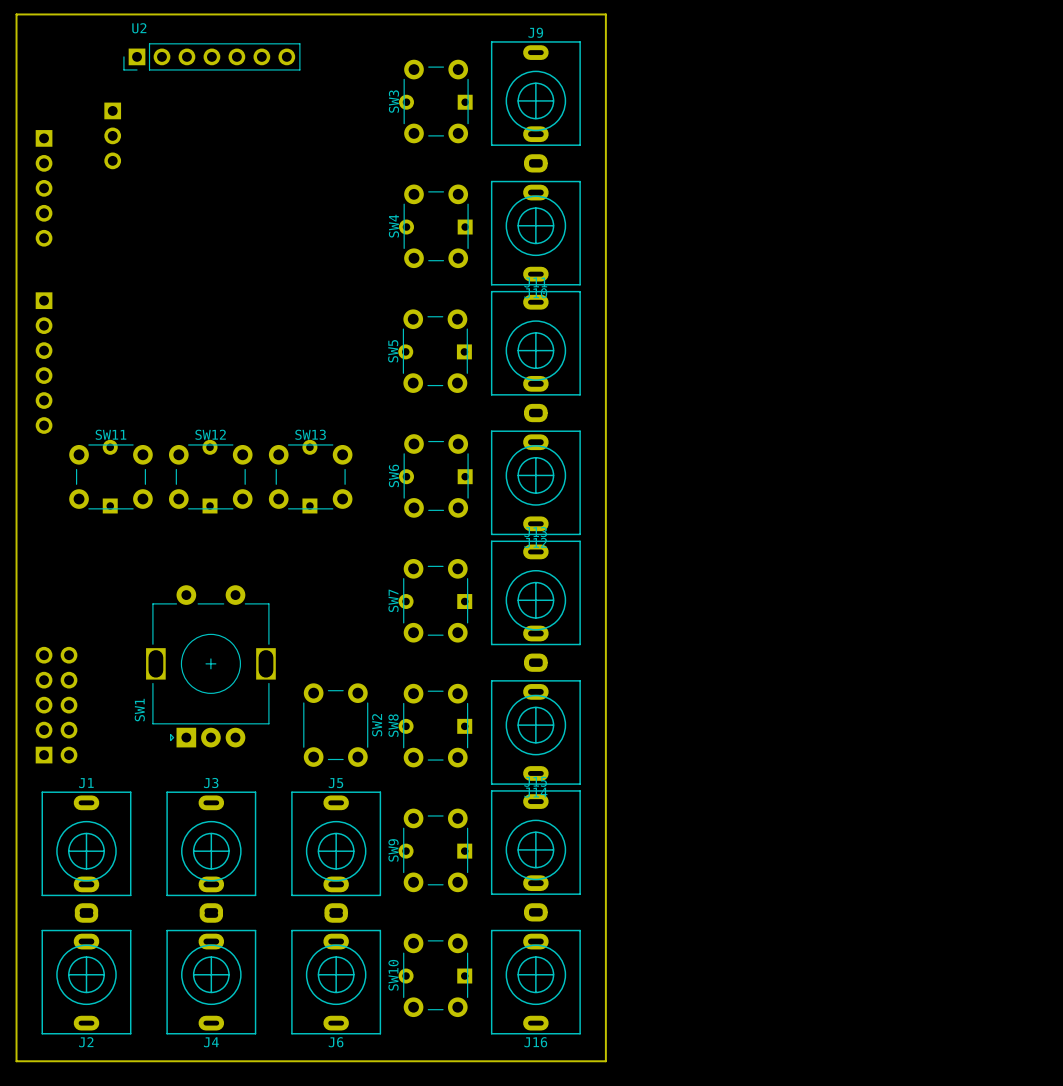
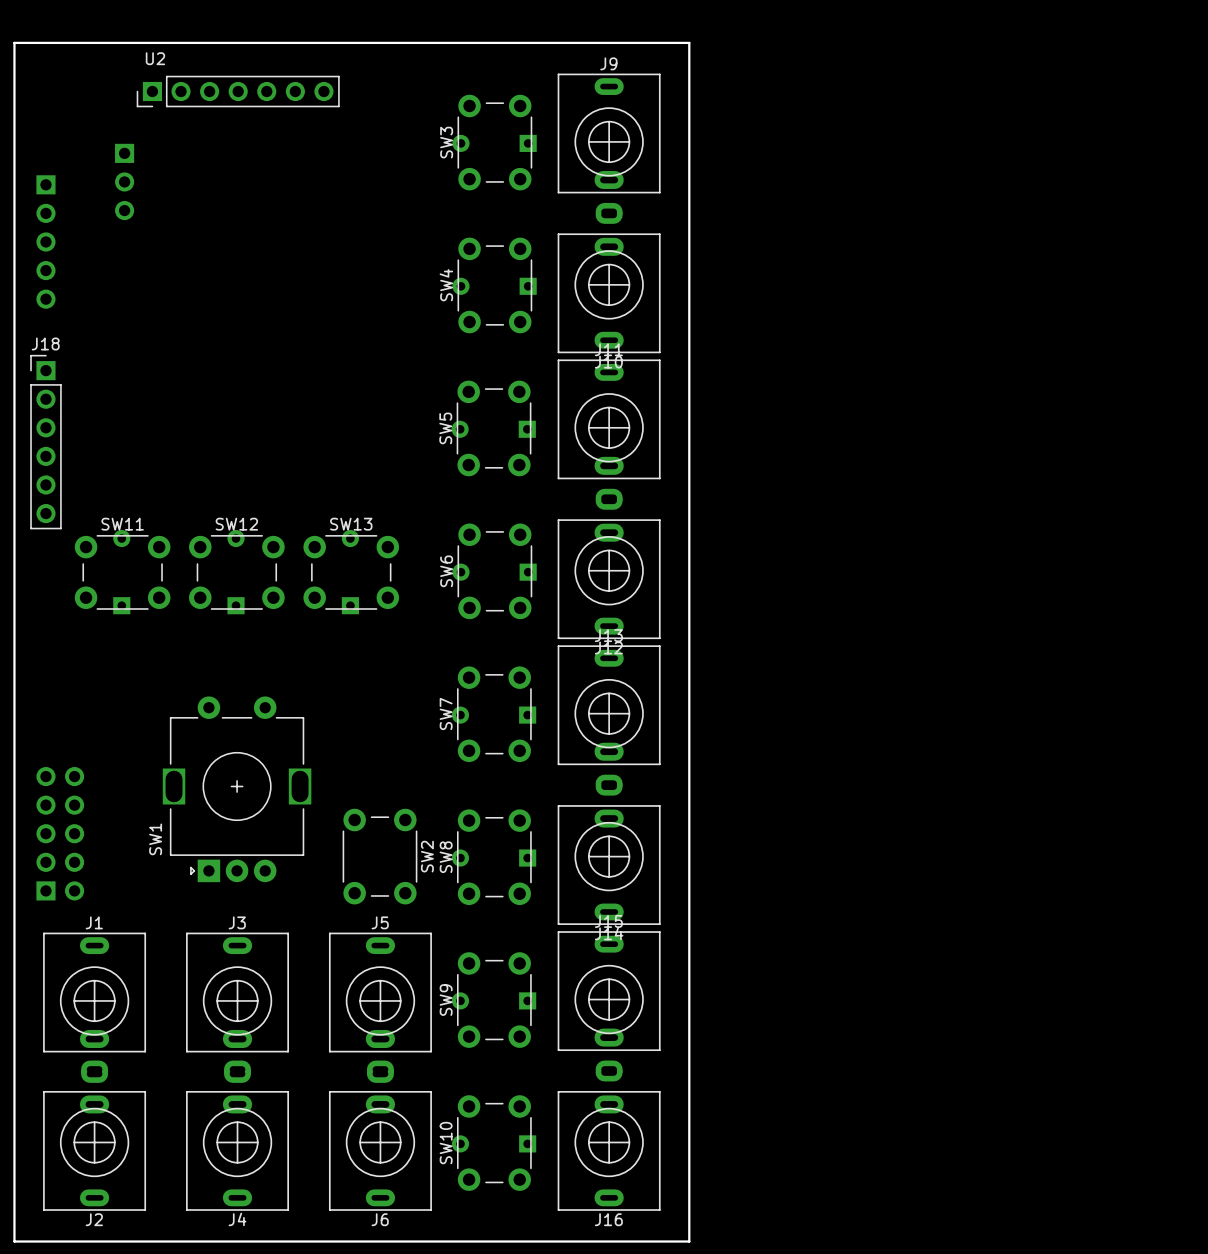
J18 side: bottom (44, 363) -> top (45, 442)

